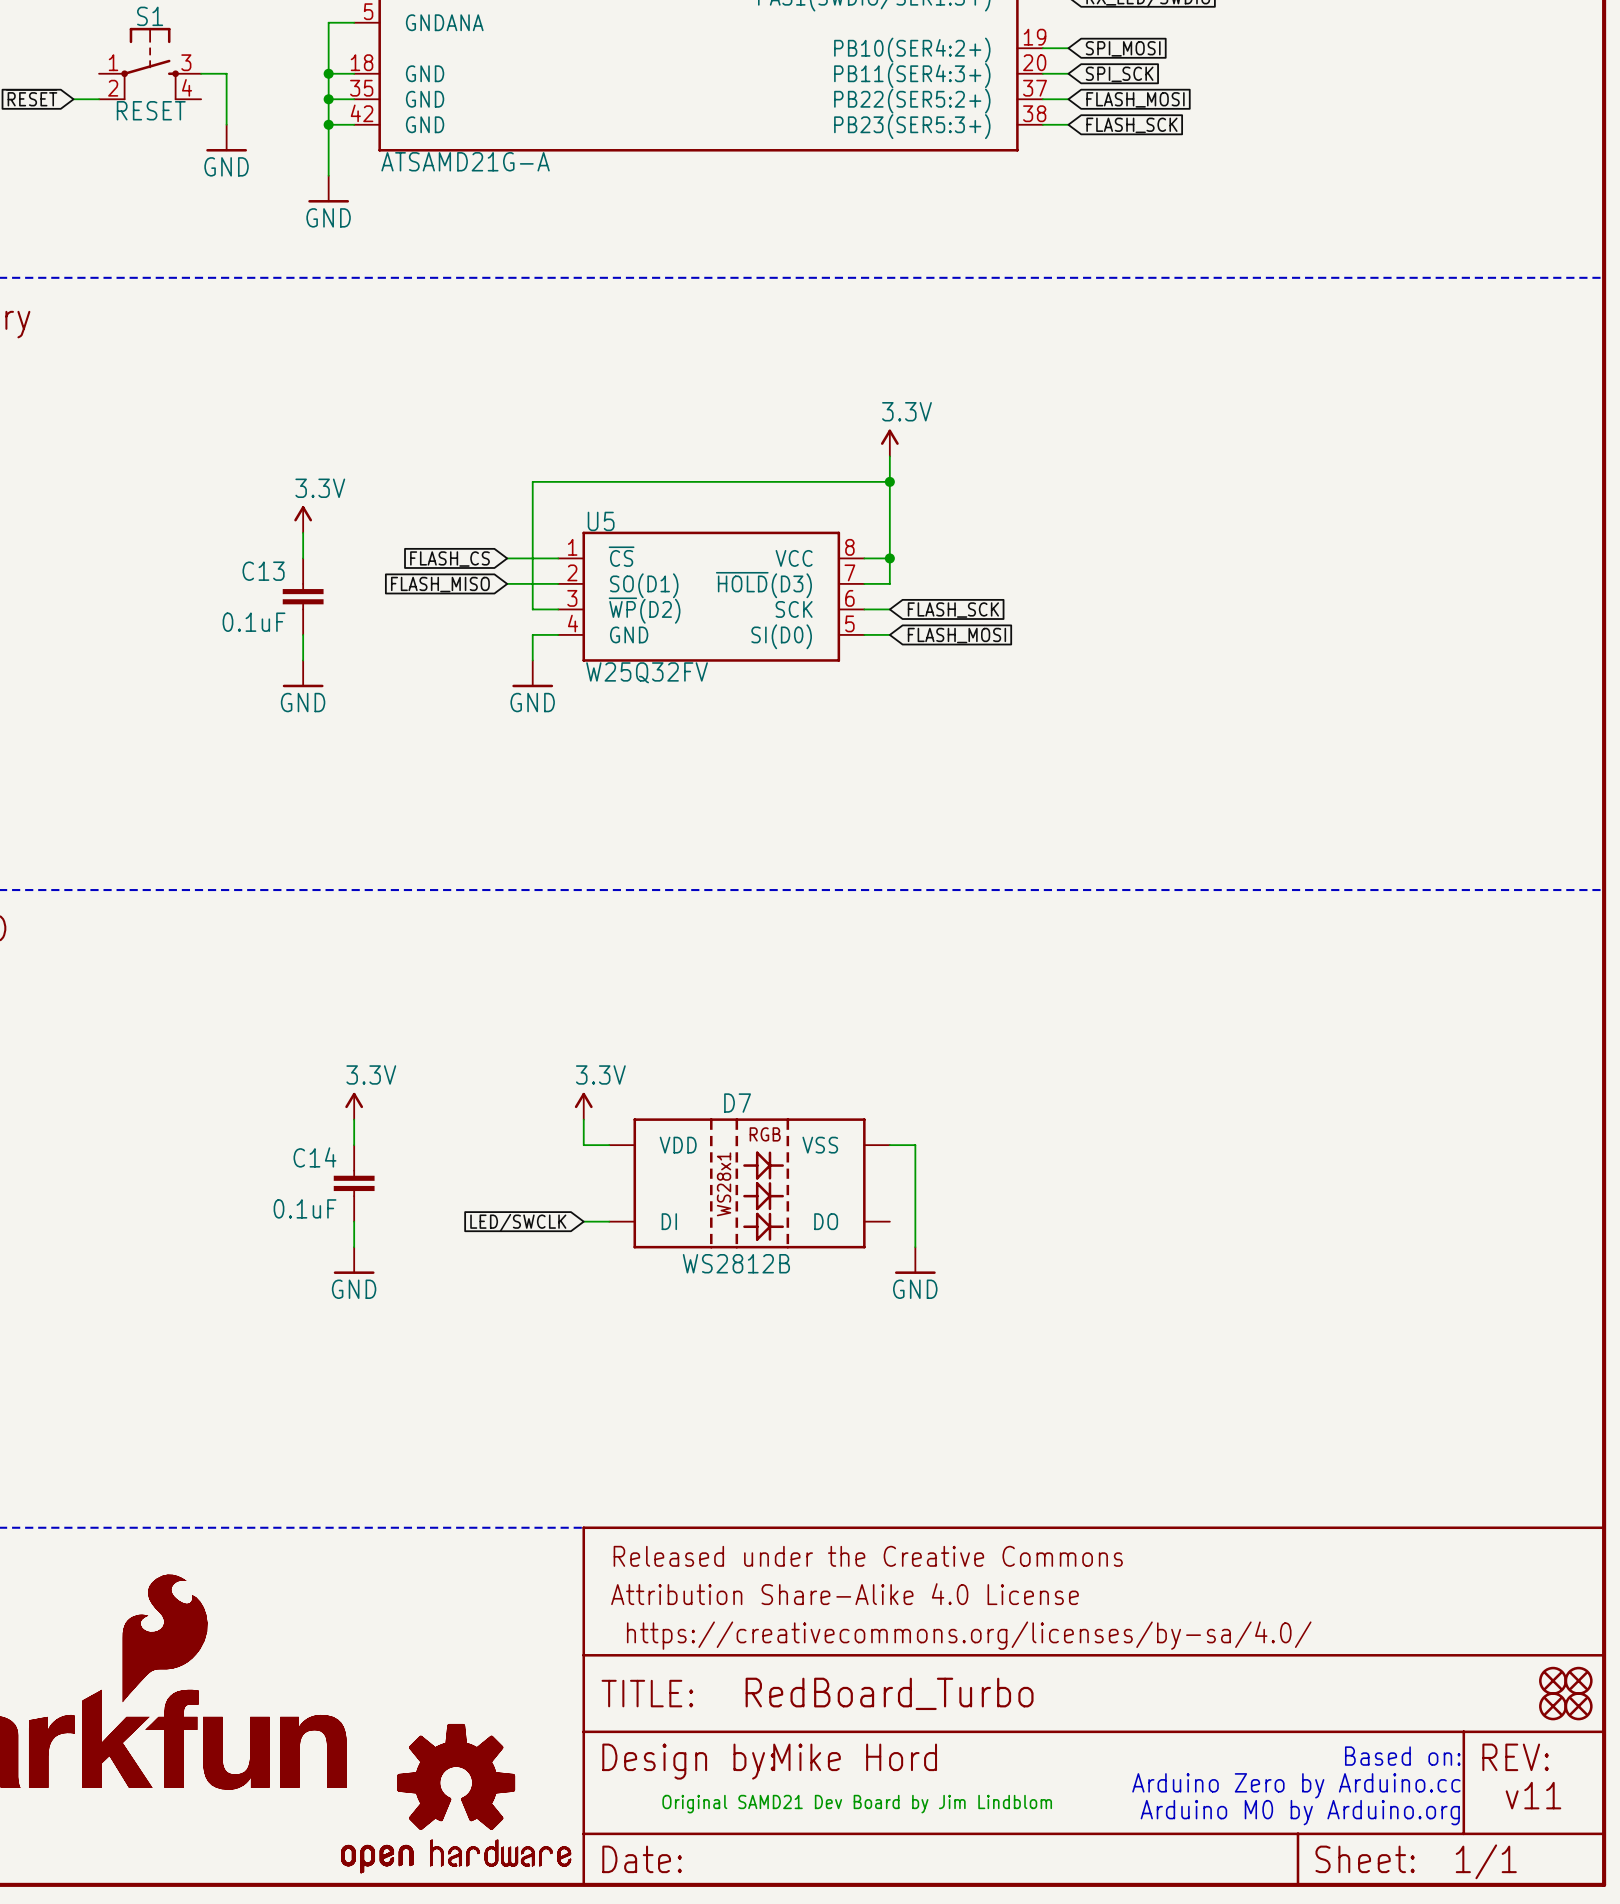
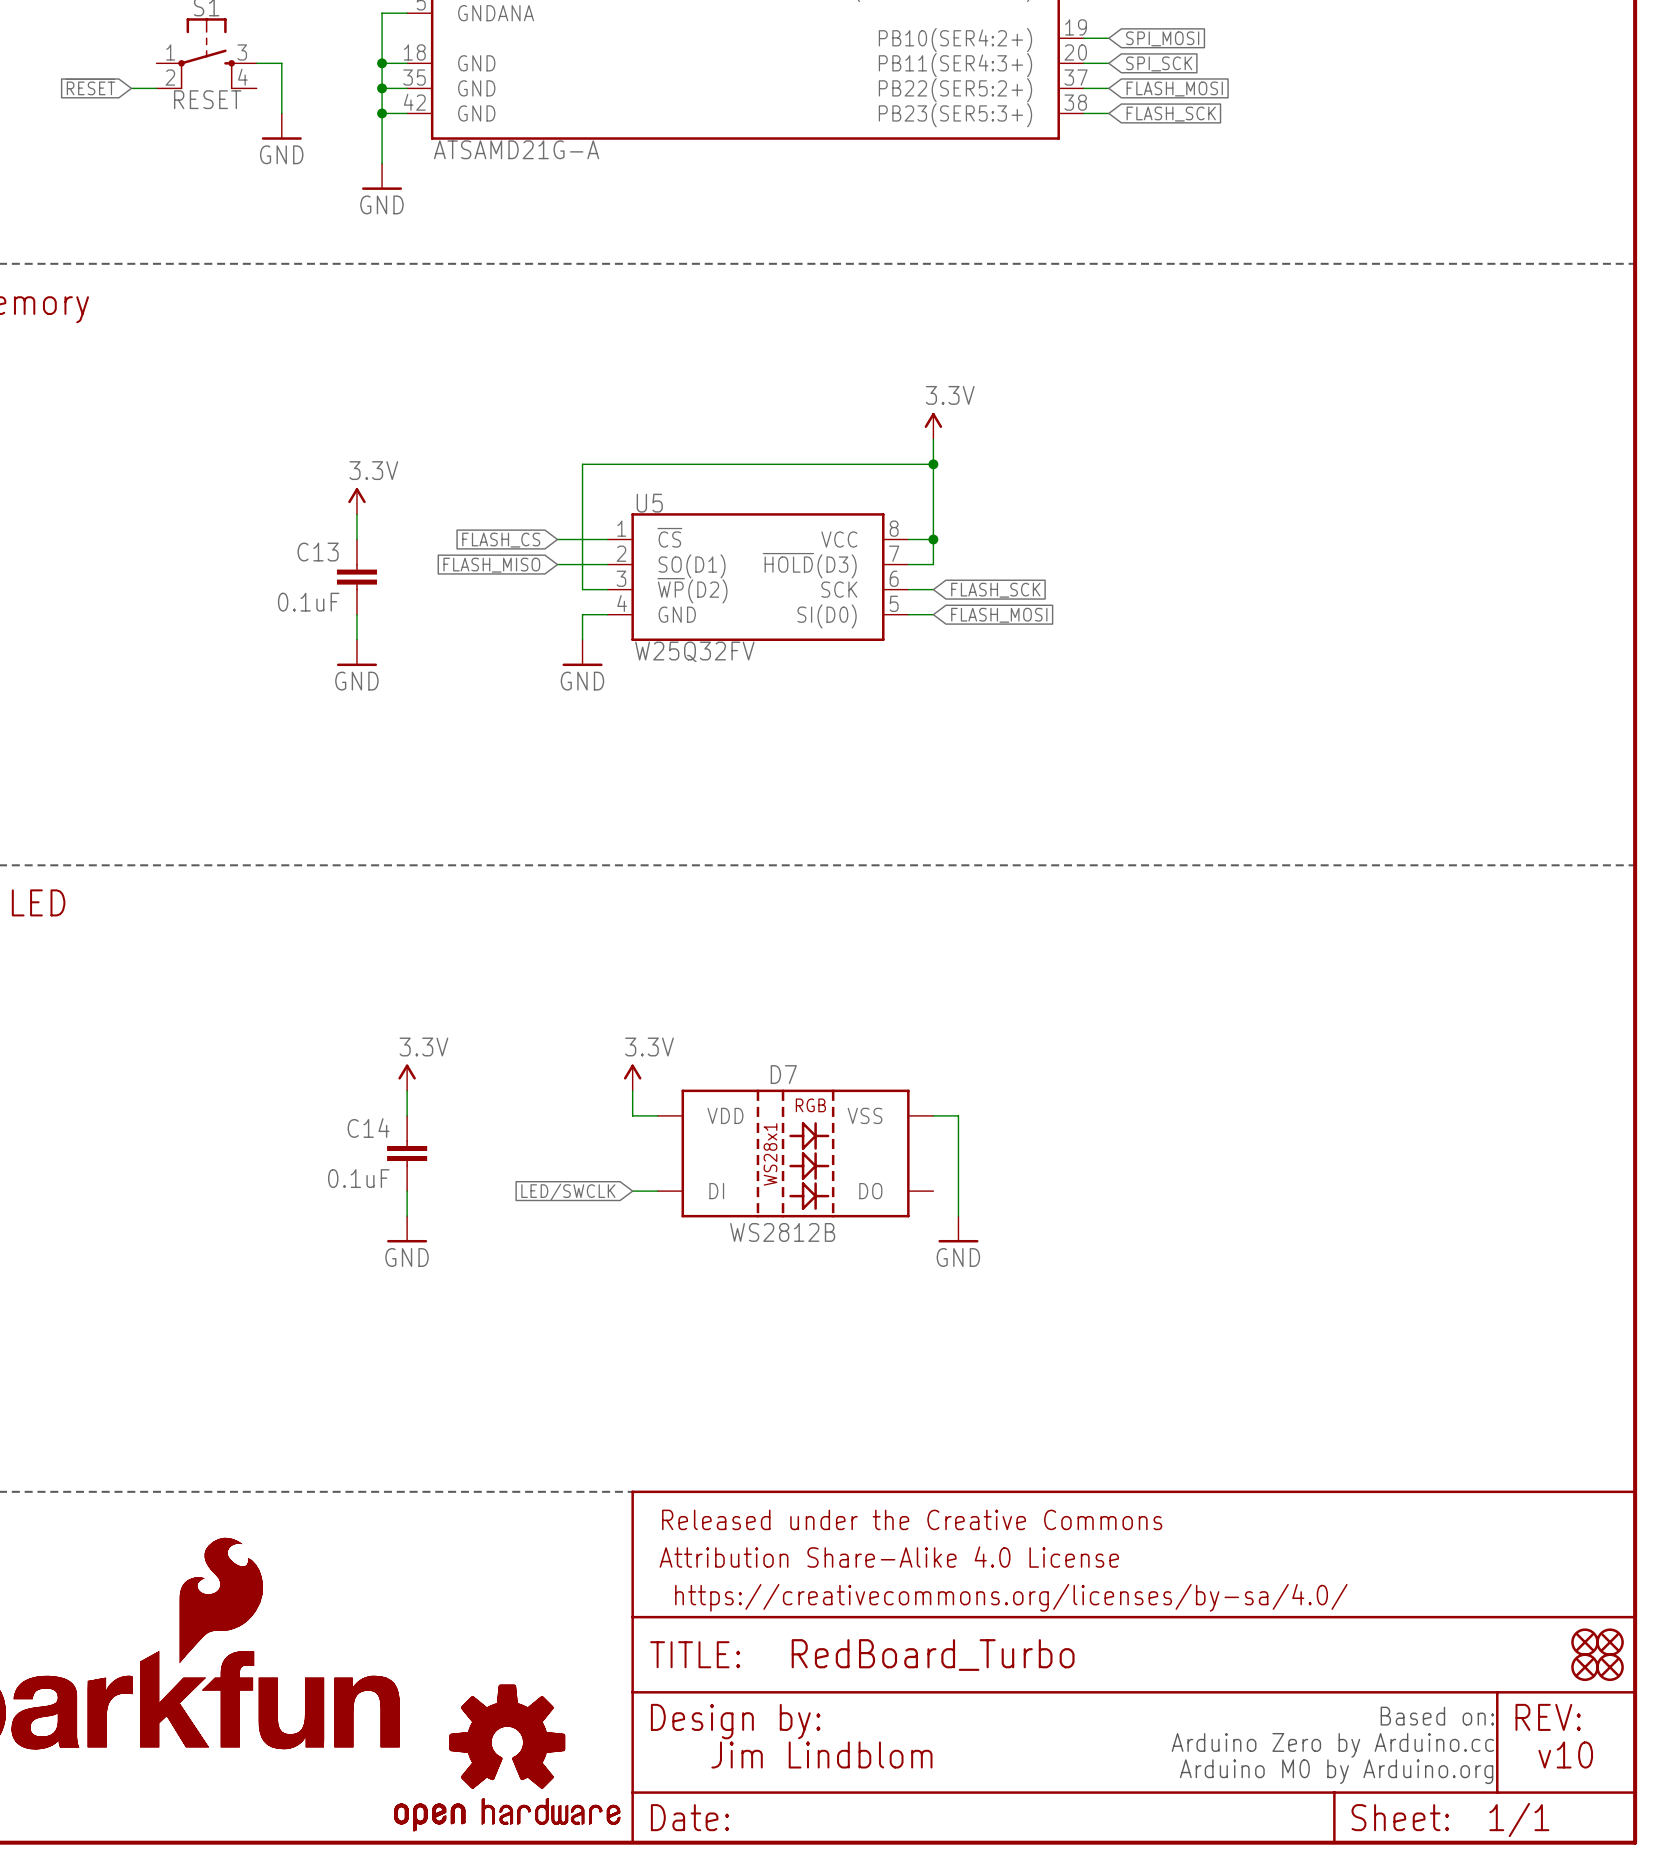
text: Mike Hord (855, 1757) -> none
text: none -> Jim Lindblom (821, 1754)
text: v11 (1533, 1795) -> v10 (1565, 1754)
text: Original SAMD21 Dev Board by Jim Lindblom (857, 1804) -> none

